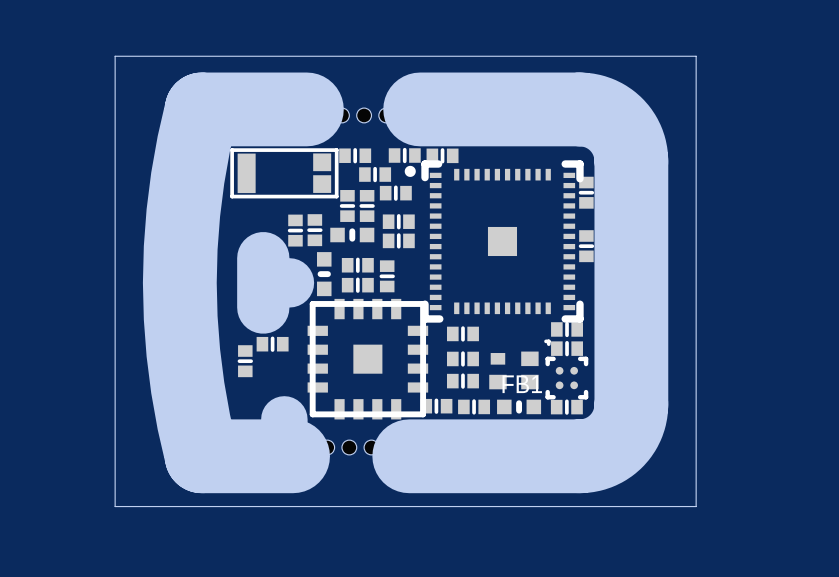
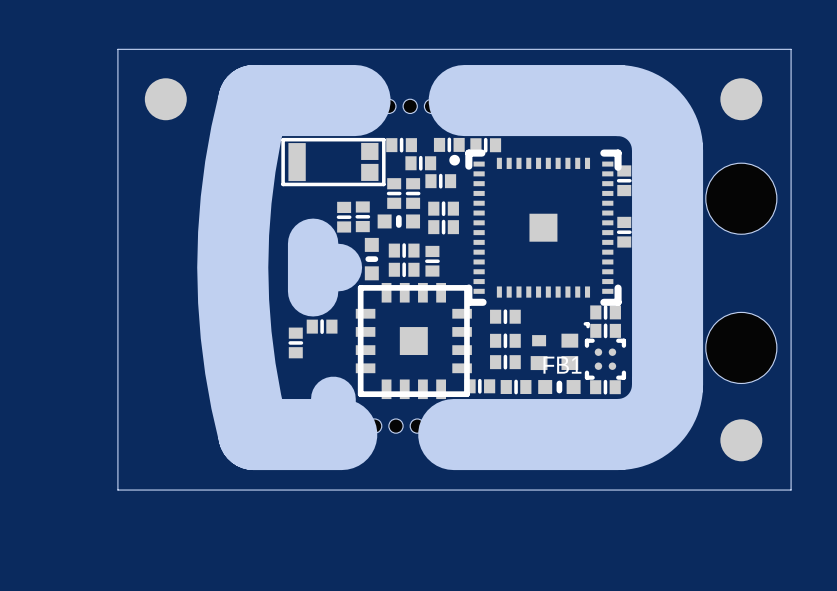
board edge: (696, 56) (696, 506) (115, 506) (115, 56) -> (729, 49) (791, 49) (791, 490) (117, 490) (117, 49) (170, 49)
part: none -> (165, 99)
part: none -> (741, 99)
hole: none -> (741, 198)
hole: none -> (741, 347)
part: none -> (741, 440)

